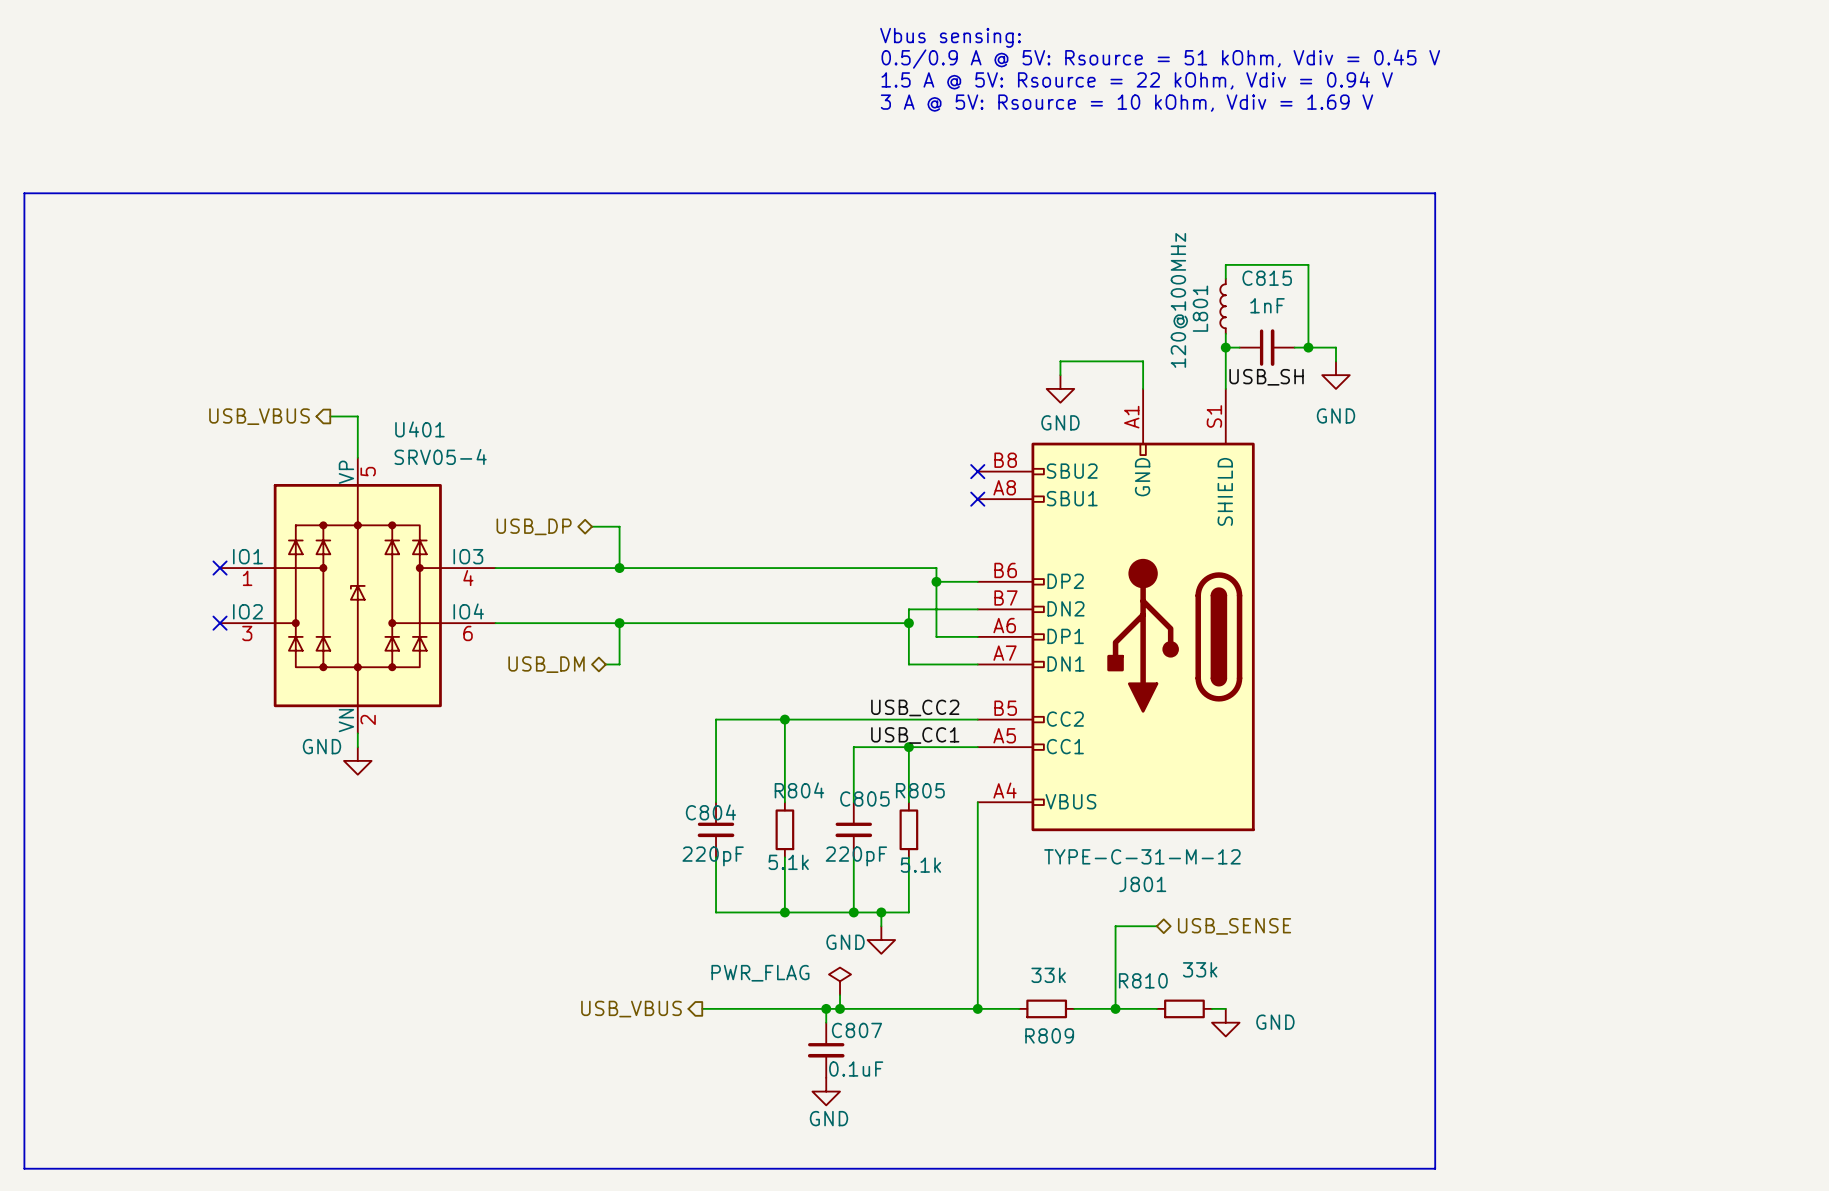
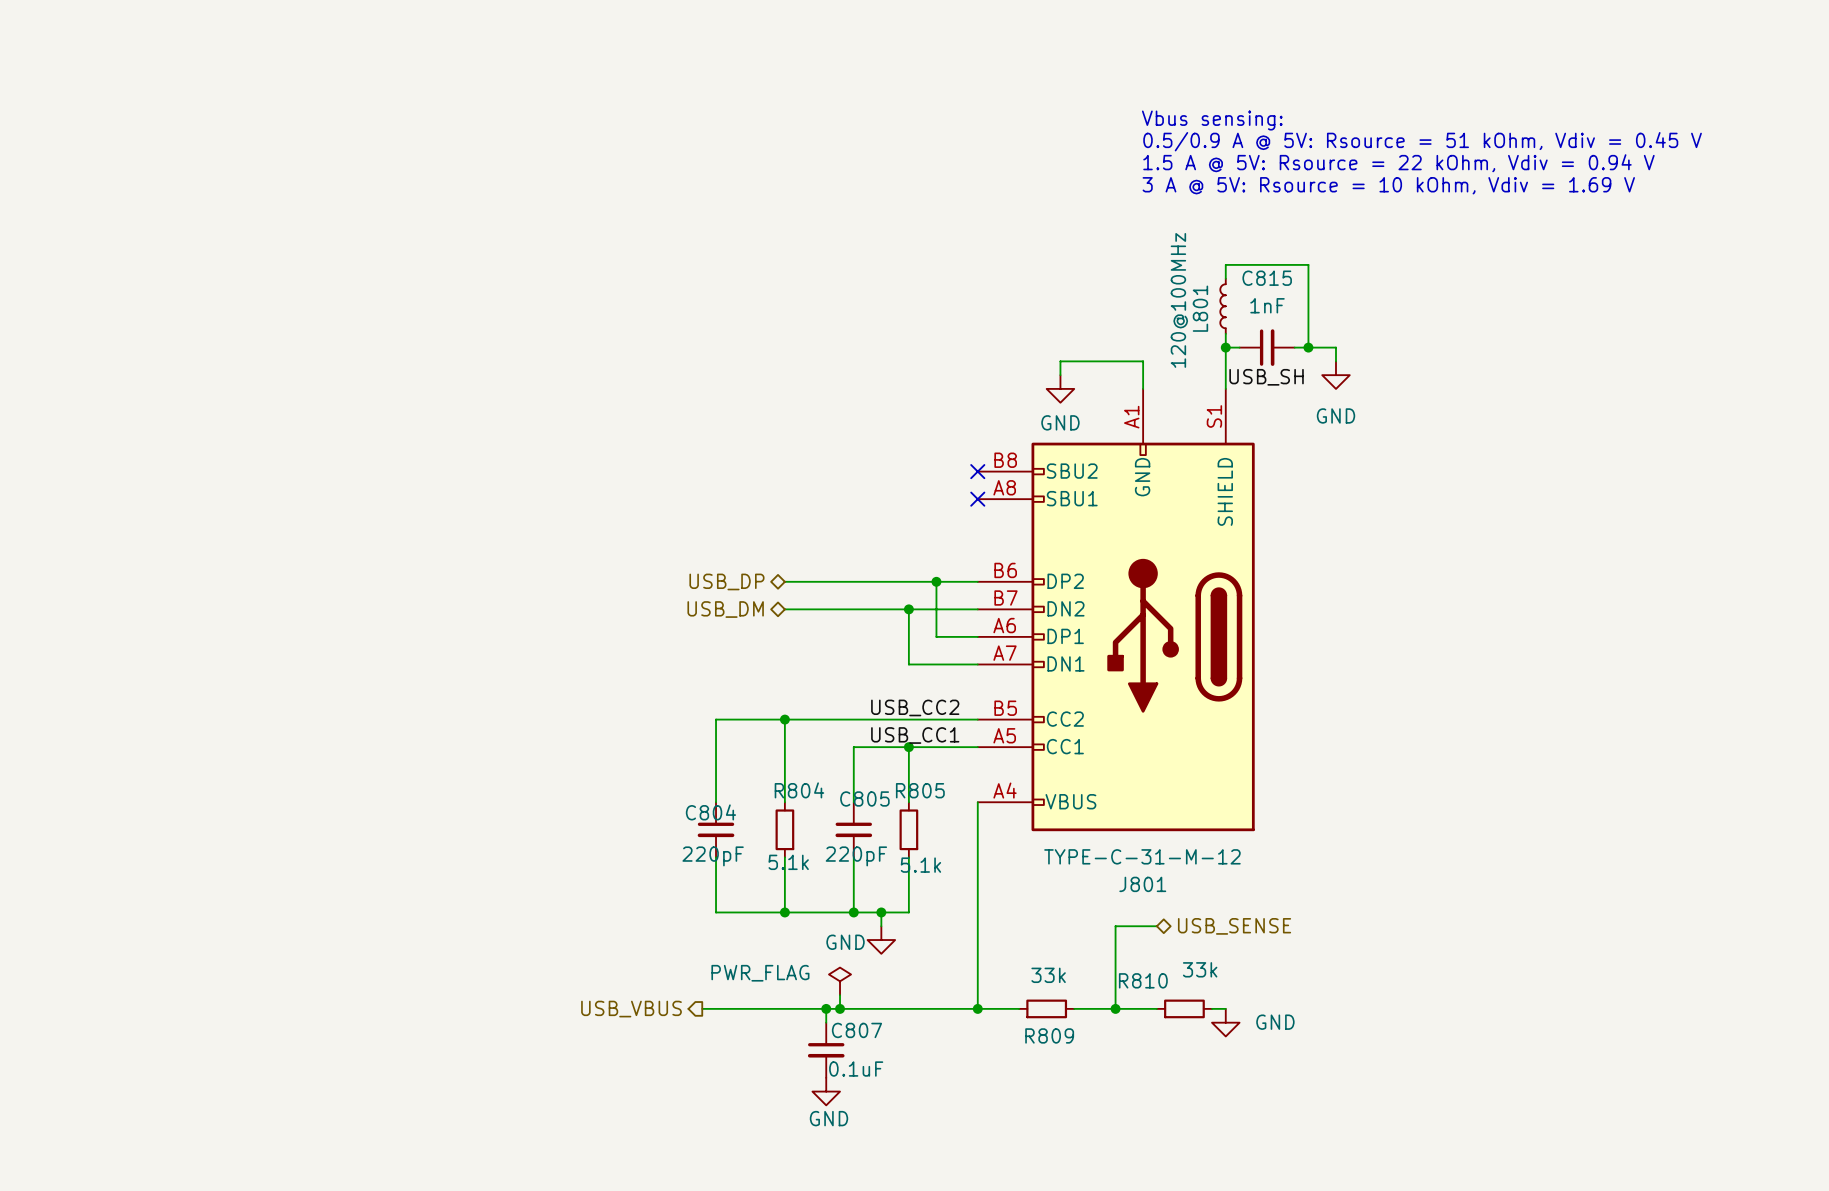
text: Vbus sensing: (950, 37) -> none
text: 0.5/0.9 A @ 5V: Rsource = 51 kOhm, Vdiv = 0.45 V (1160, 59) -> none
text: 1.5 A @ 5V: Rsource = 22 kOhm, Vdiv = 0.94 V (1137, 80) -> none
text: 3 A @ 5V: Rsource = 10 kOhm, Vdiv = 1.69 V (1127, 103) -> none
text: none -> Vbus sensing: (1212, 120)
text: none -> 0.5/0.9 A @ 5V: Rsource = 51 kOhm, Vdiv = 0.45 V (1422, 141)
text: none -> 1.5 A @ 5V: Rsource = 22 kOhm, Vdiv = 0.94 V (1398, 163)
text: none -> 3 A @ 5V: Rsource = 10 kOhm, Vdiv = 1.69 V (1388, 185)
line: (24, 193) (1435, 193) (1435, 1168) (24, 1168) (24, 193) -> none
hierarchical label: USB_VBUS (259, 416) -> none
wire: (330, 416) (357, 416) (357, 457) -> none
hierarchical label position: USB_DP (534, 526) -> USB_DP (726, 581)
wire: (592, 526) (619, 526) (619, 568) -> none
no-connect mark: (220, 568) -> none
wire: (495, 568) (936, 568) (936, 581) -> (784, 581) (936, 581)
junction: (619, 568) -> none
U401: SRV05-4 (357, 595) -> none
wire: none -> (784, 609) (908, 609)
no-connect mark: (220, 623) -> none
wire: (495, 623) (908, 623) -> none
wire: (619, 623) (619, 664) (605, 664) -> none
junction: (619, 623) -> none
junction position: (908, 623) -> (908, 609)
hierarchical label position: USB_DM (546, 664) -> USB_DM (725, 609)
wire: (357, 733) (357, 747) -> none
power symbol: GND (357, 760) -> none

